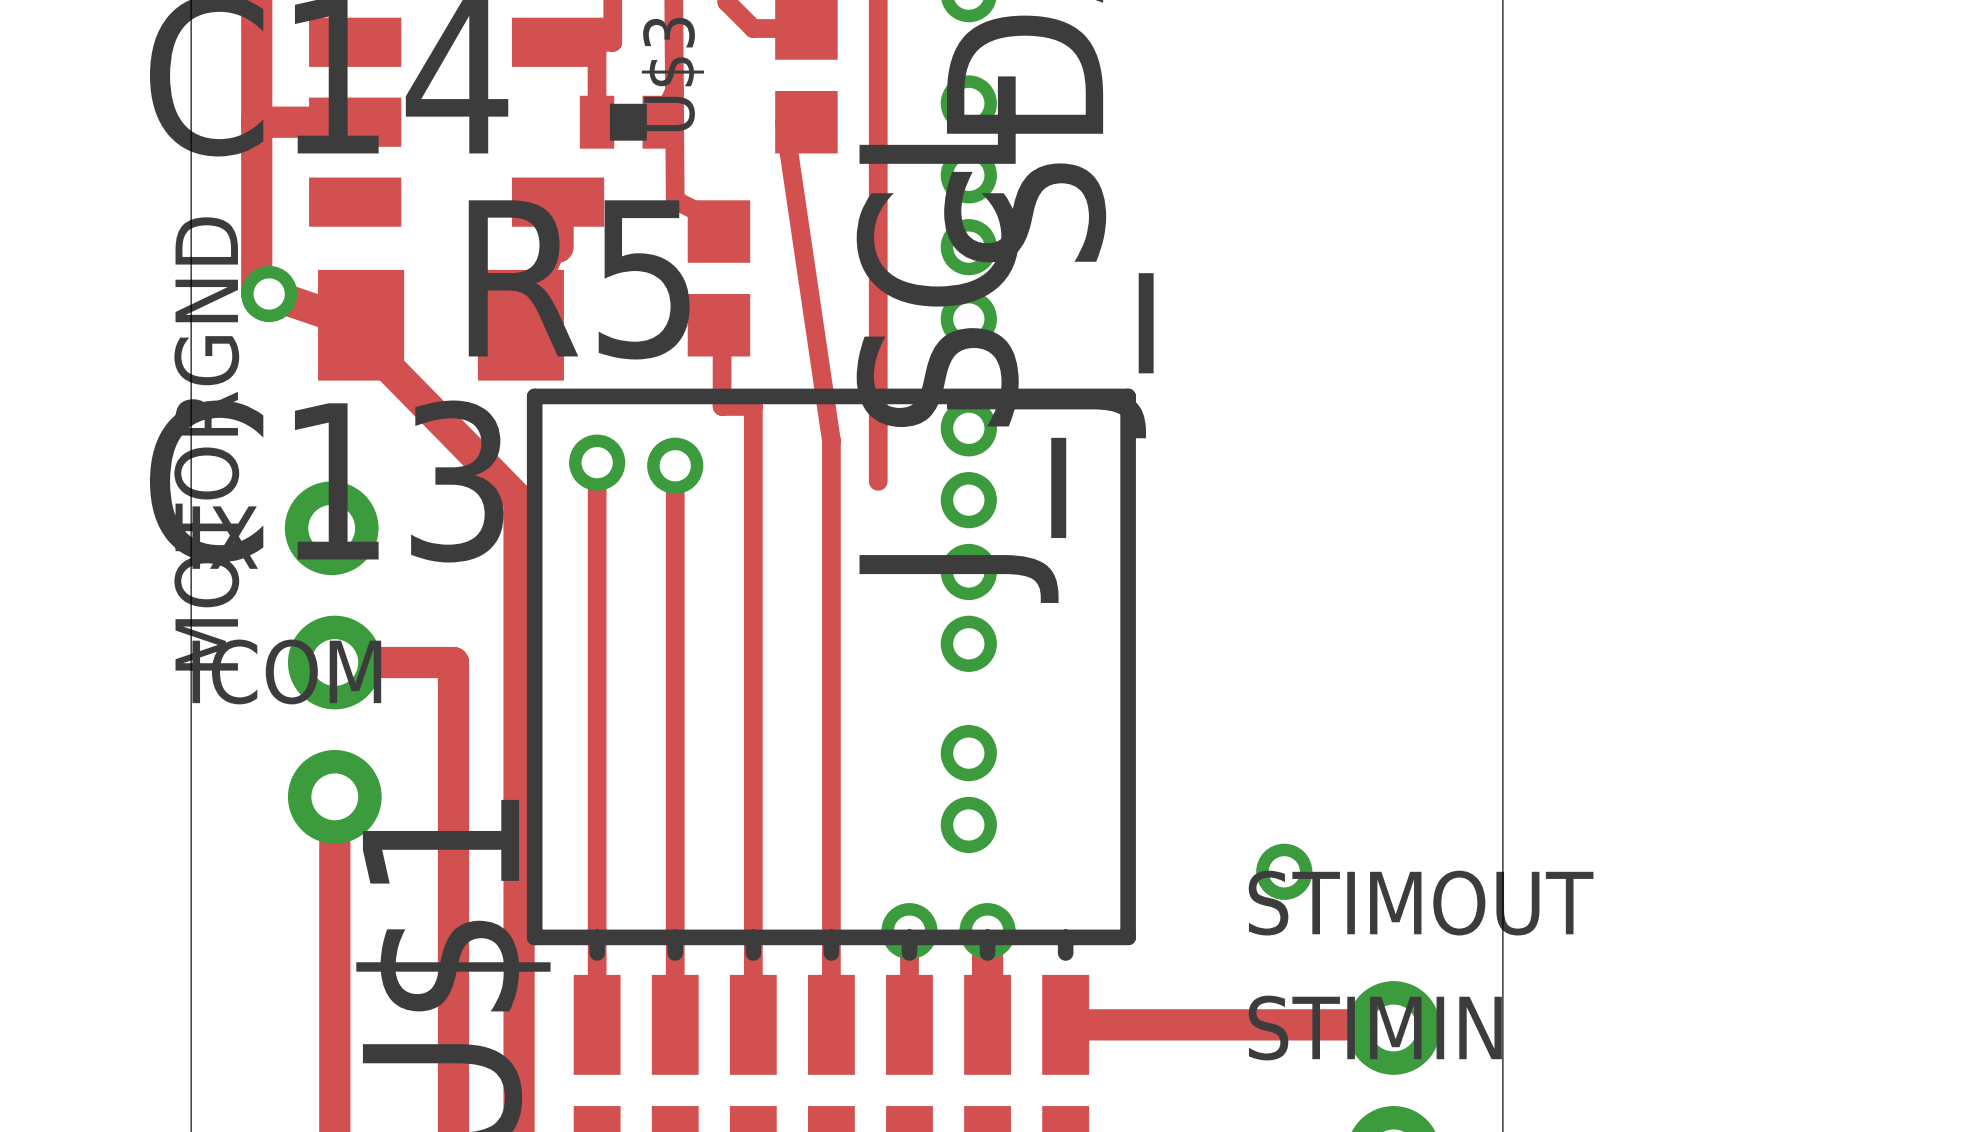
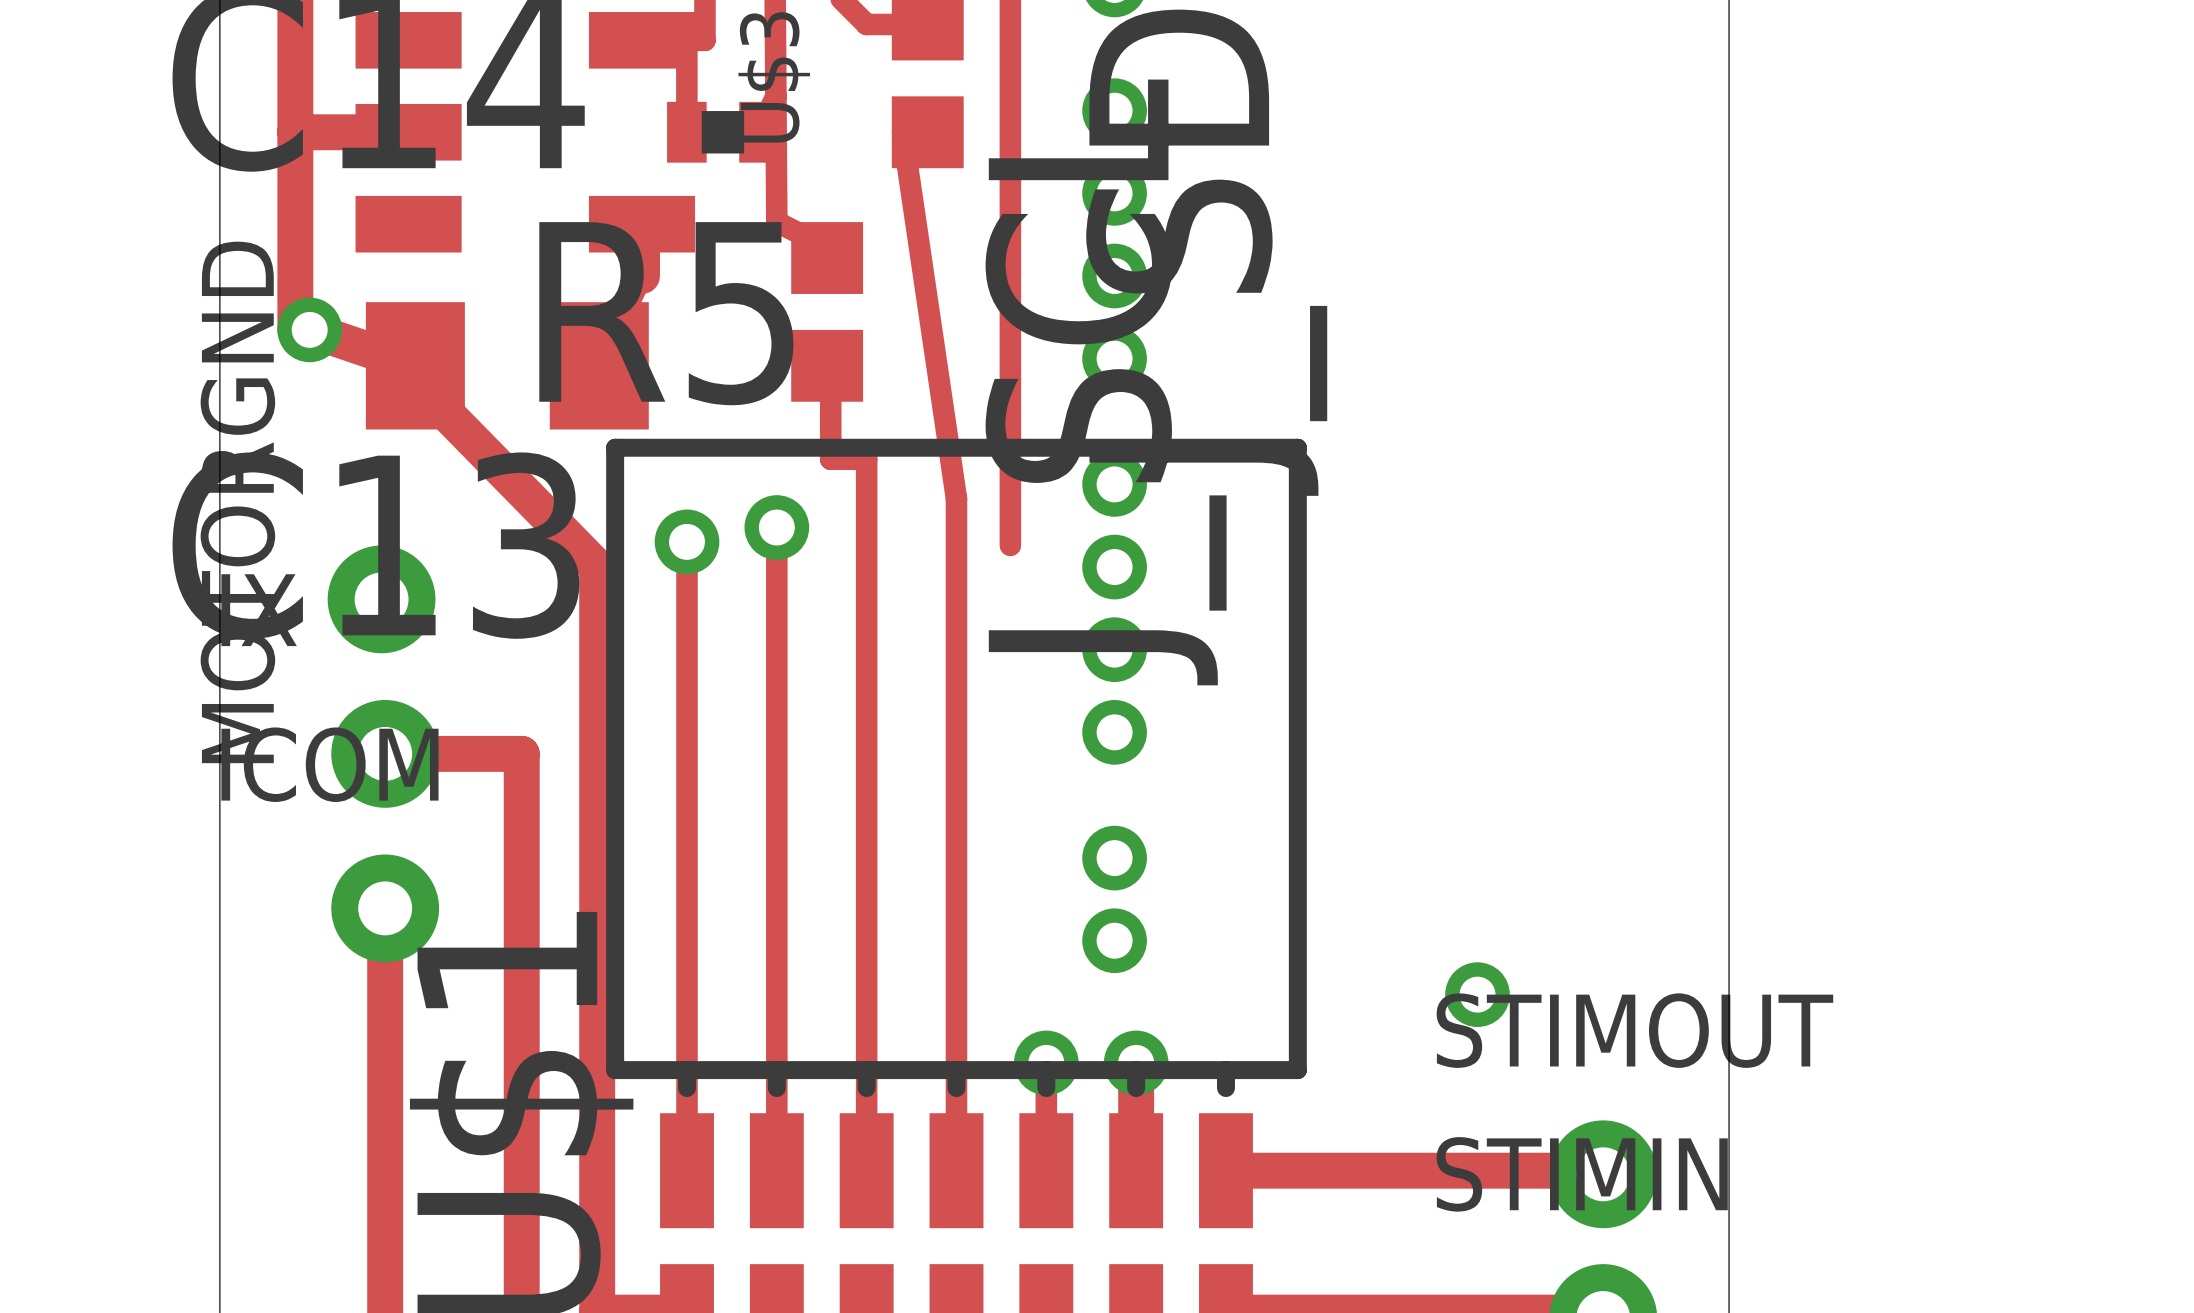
via position: (597, 462) -> (687, 541)

